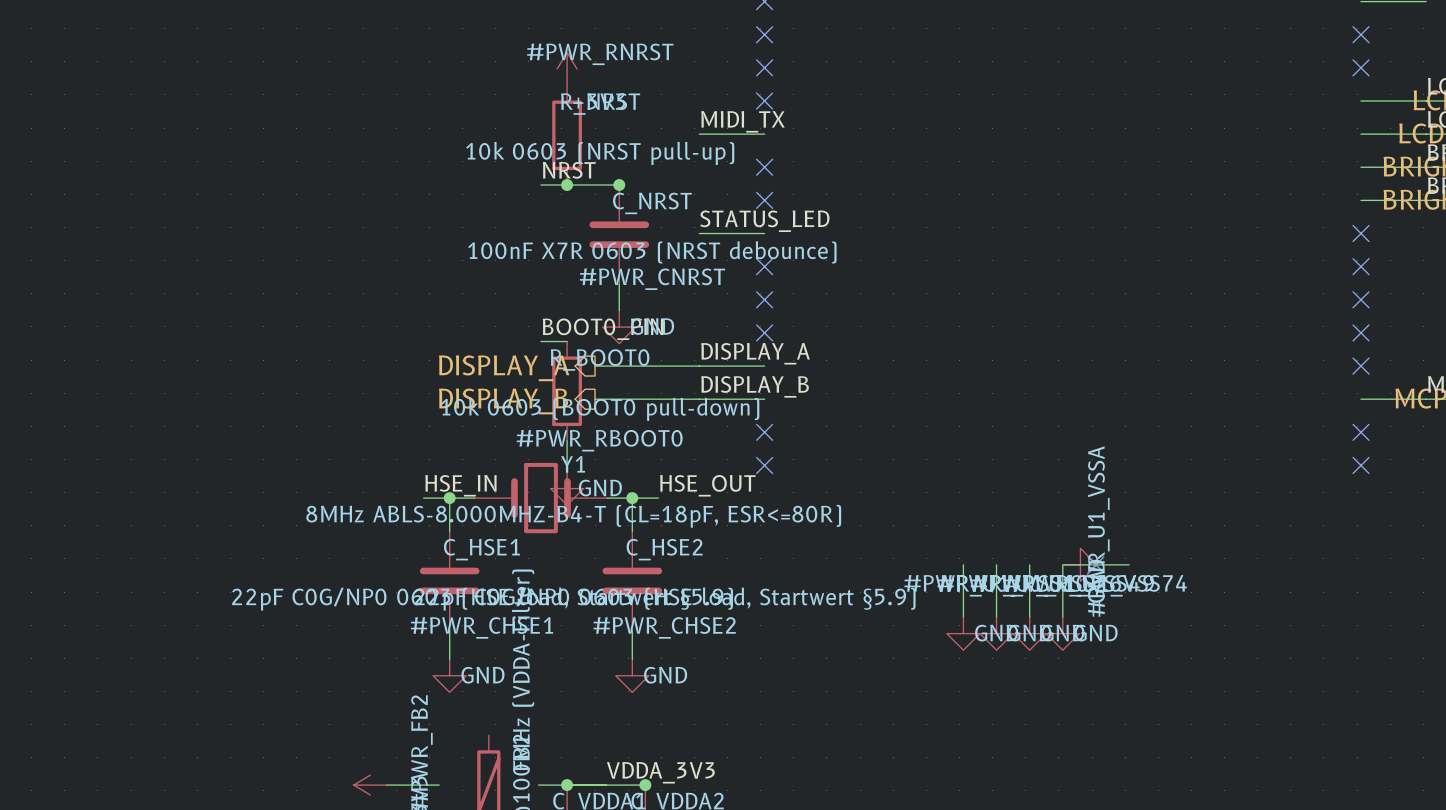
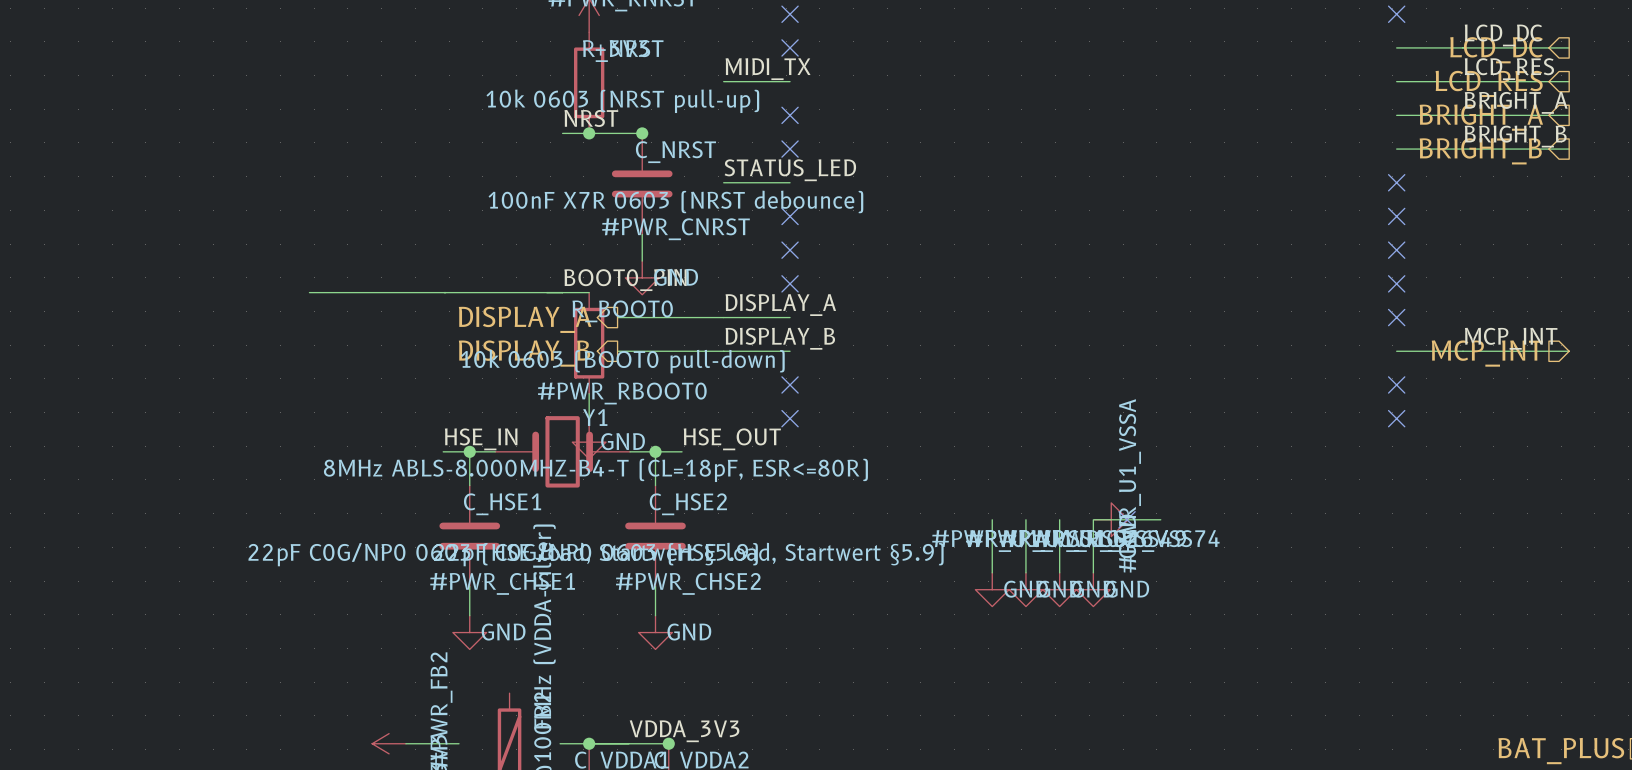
wire: none -> (309, 292) (562, 292)

